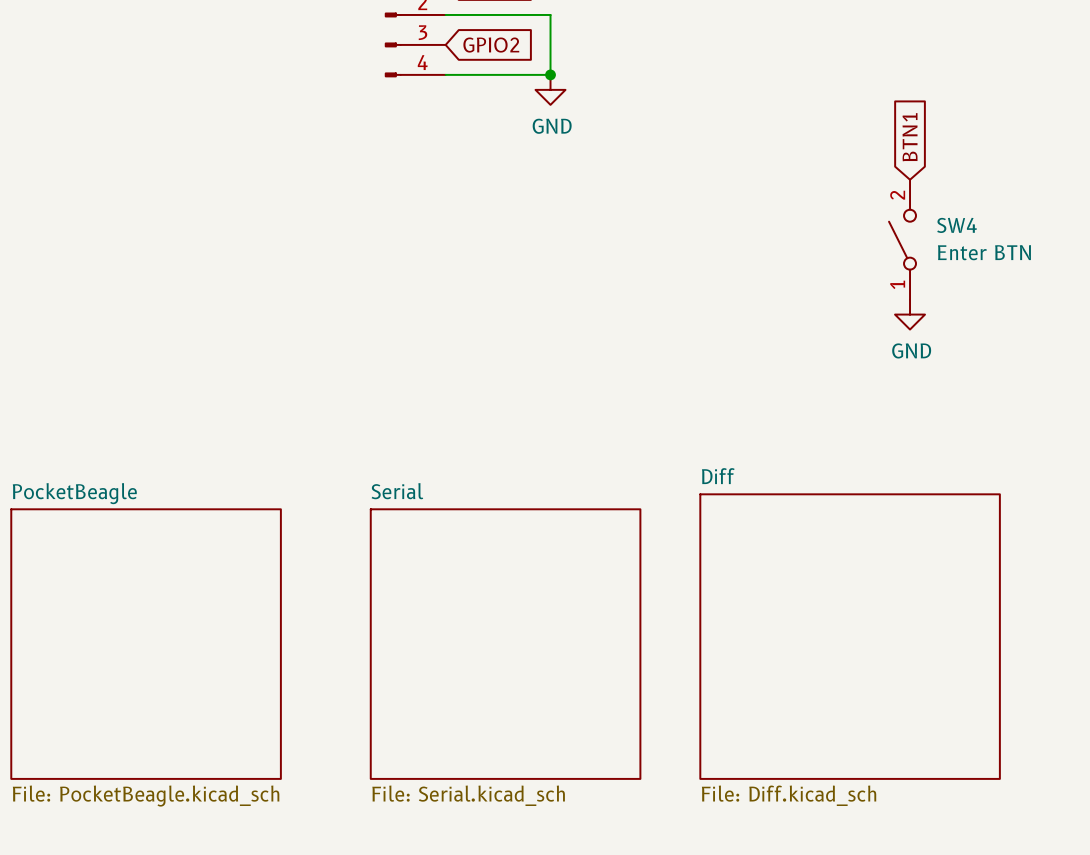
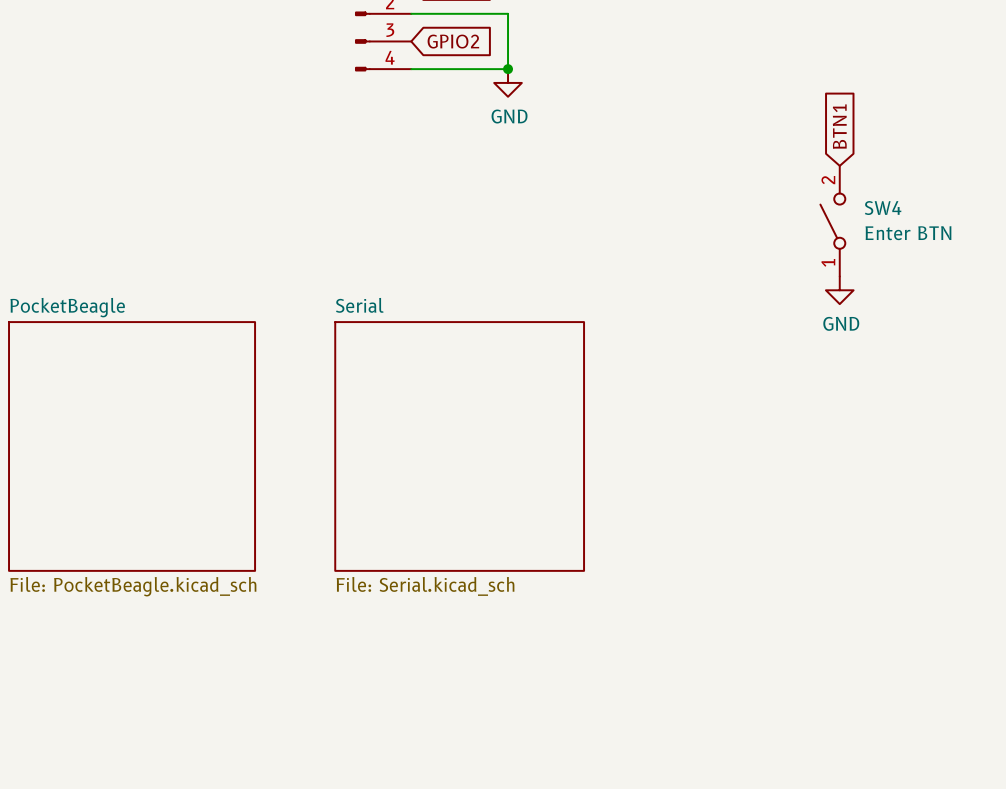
sheet PocketBeagle: none -> File: PocketBeagle.kicad_sch (132, 446)
sheet Diff: File: Diff.kicad_sch (850, 636) -> none
sheet PocketBeagle: File: PocketBeagle.kicad_sch (146, 644) -> none
sheet Serial position: (505, 644) -> (459, 446)

